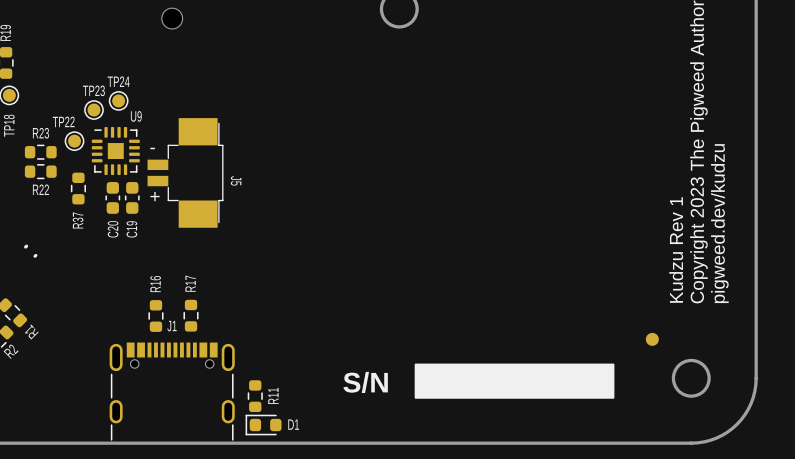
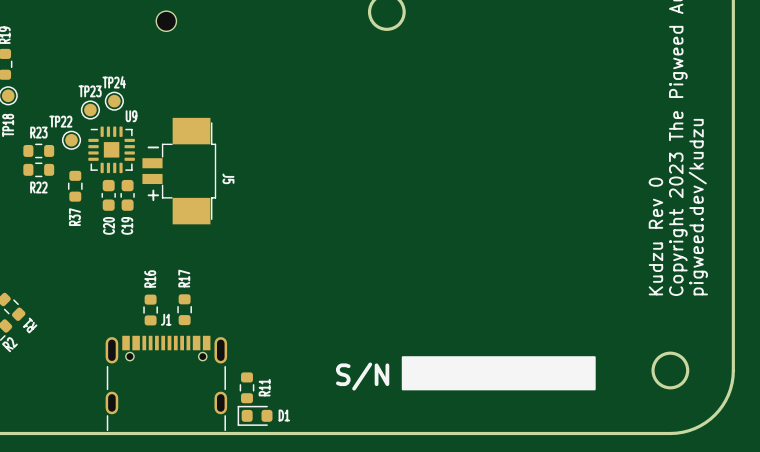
drawing: [24, 244, 38, 258] -> none
text: Kudzu Rev 1 (676, 250) -> Kudzu Rev 0 (655, 236)
part: (652, 339) -> none

